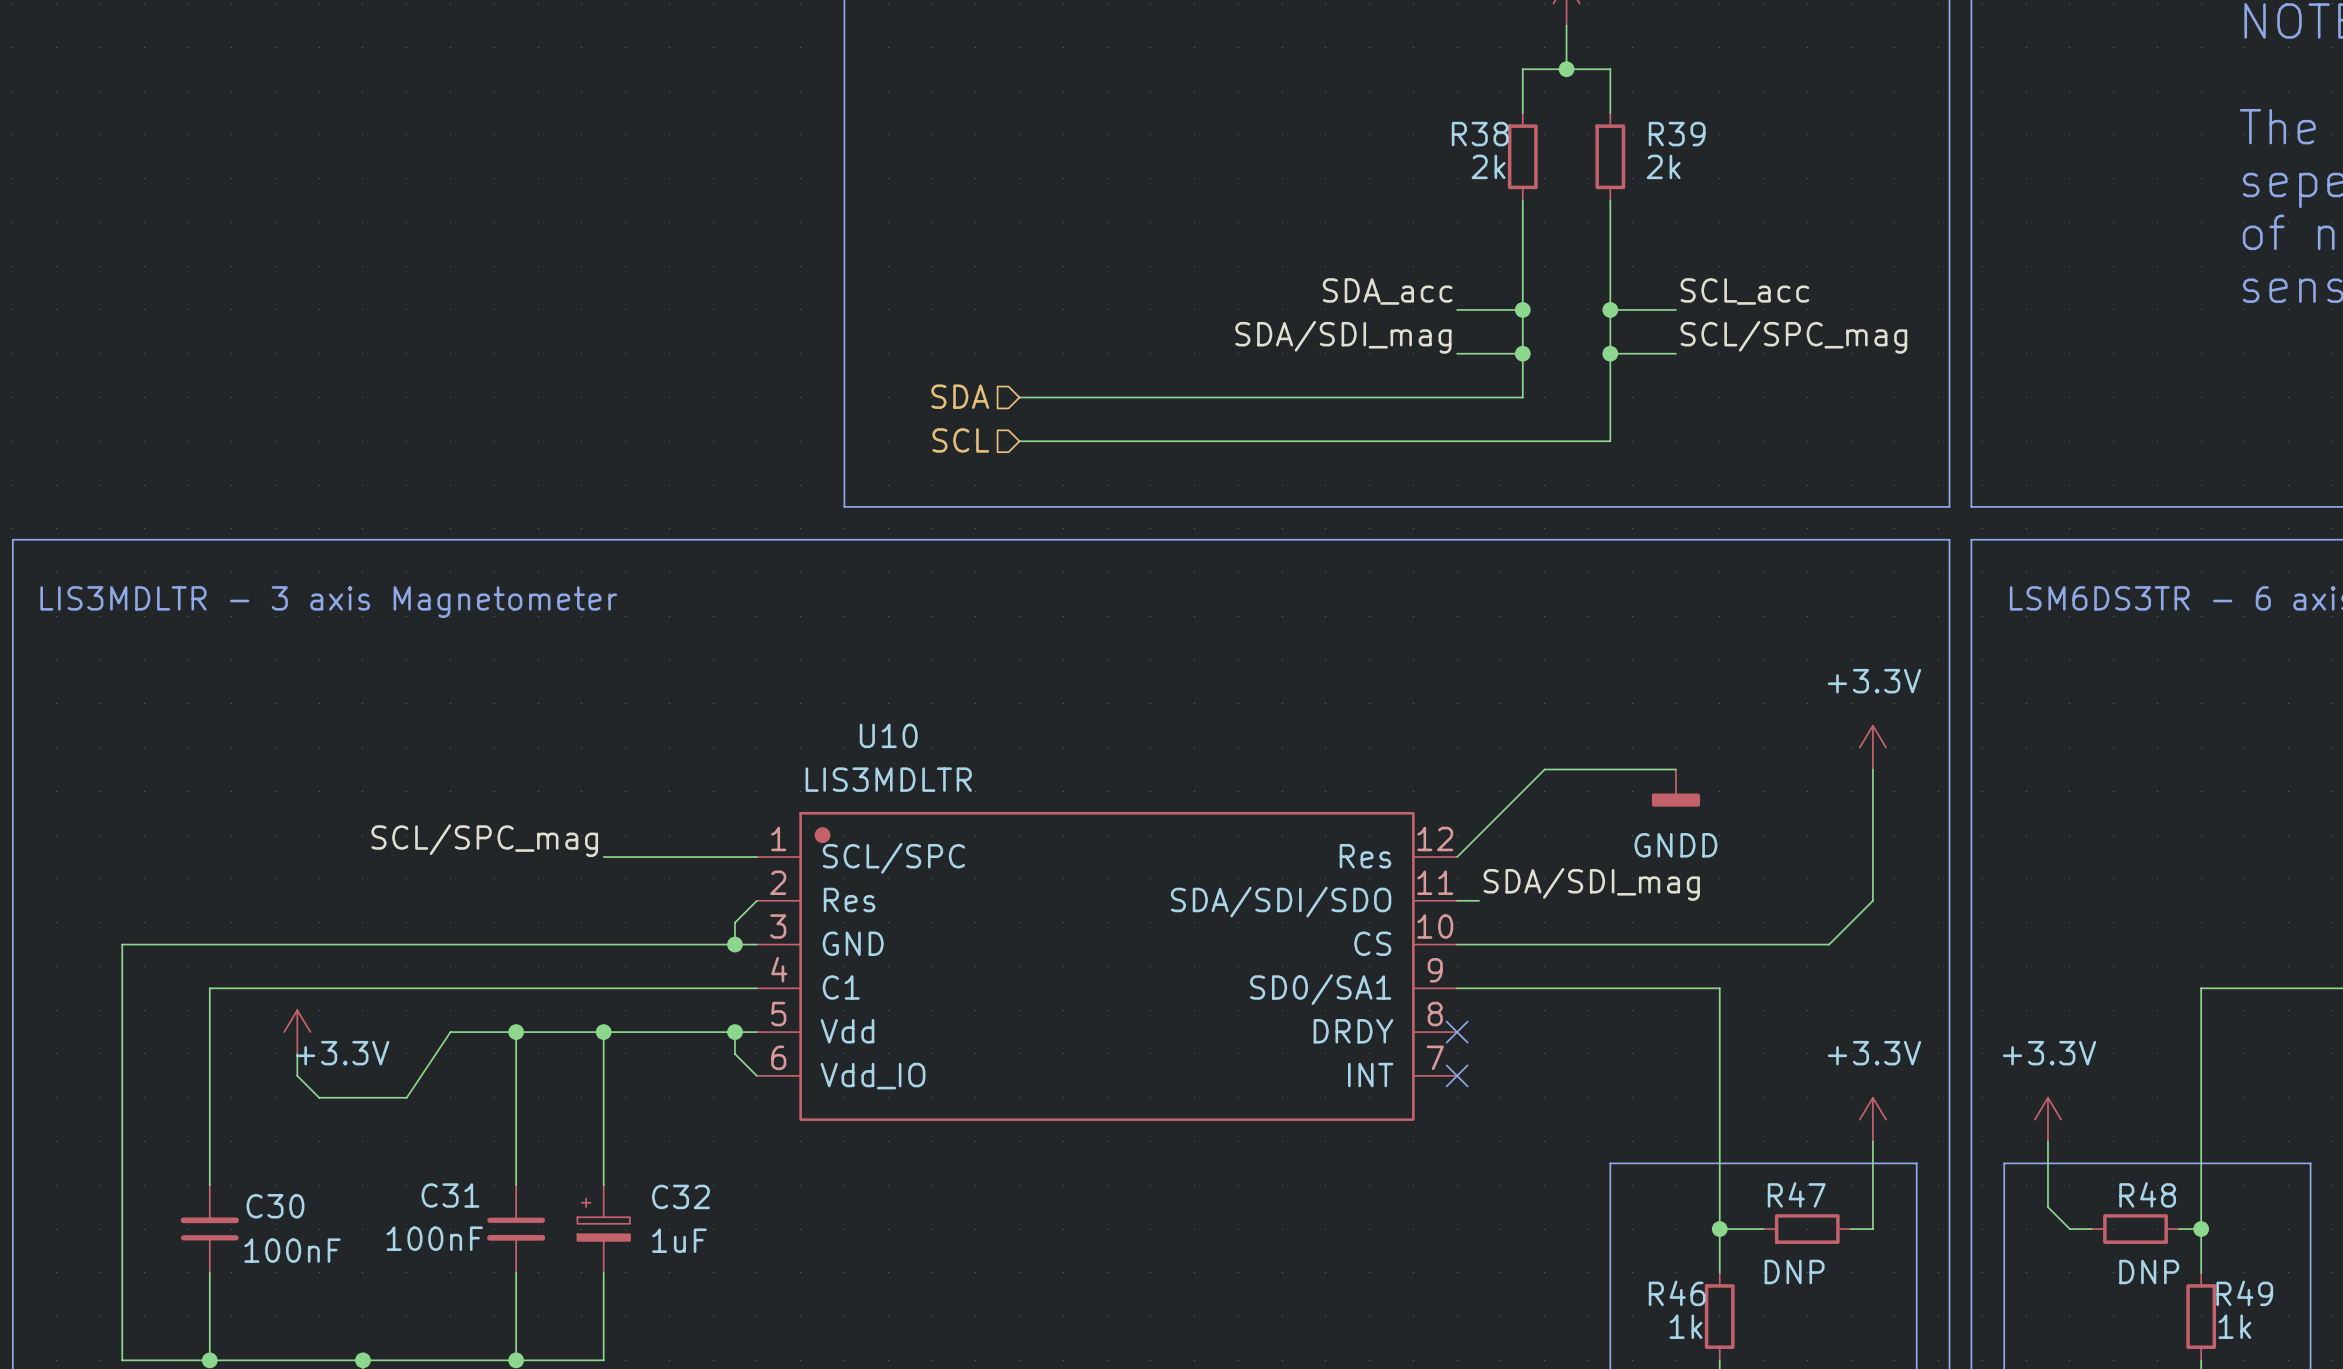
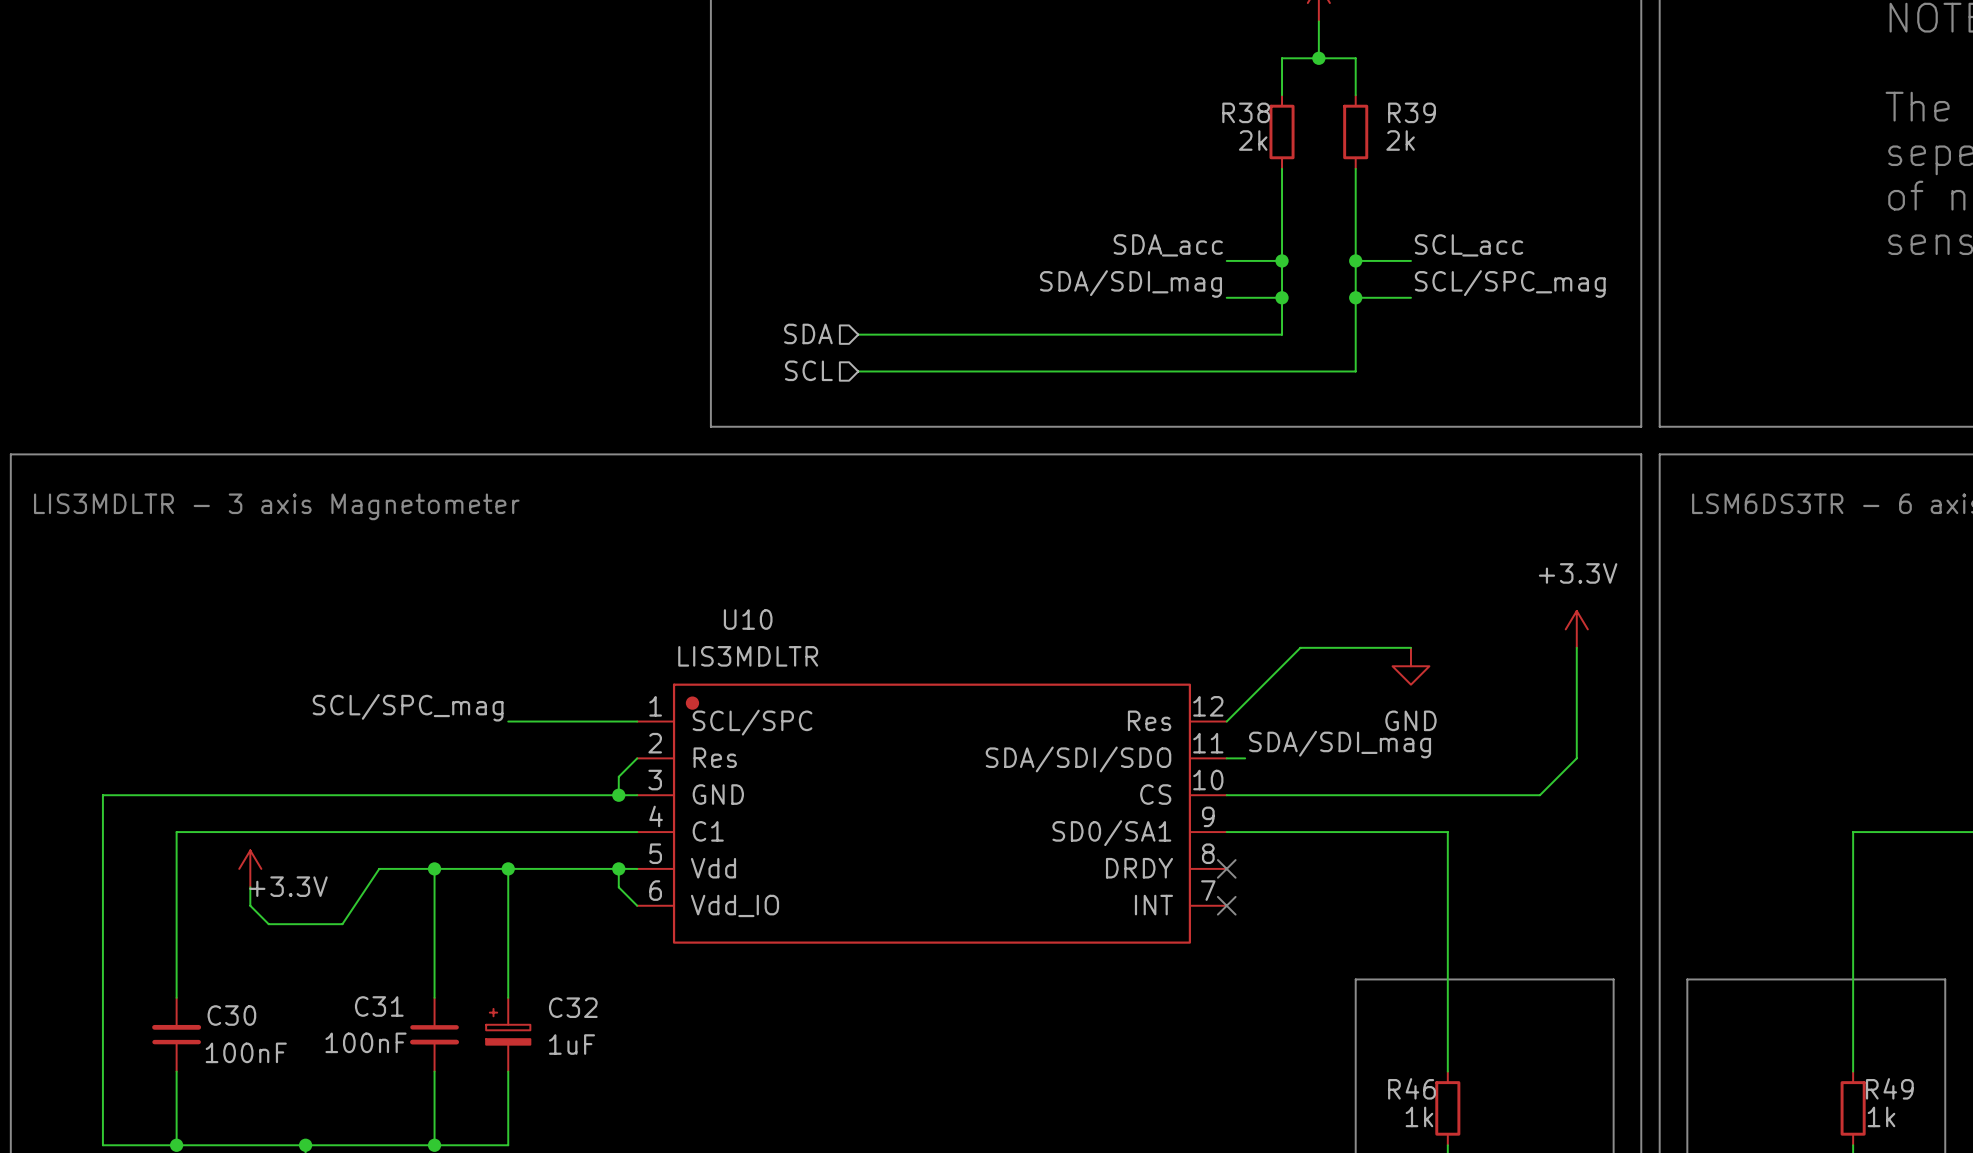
power symbol: GNDD (1675, 788) -> GND (1410, 666)
power symbol: +3.3V (1872, 1119) -> none
power symbol: +3.3V (2047, 1119) -> none
wire: (1872, 1141) (1872, 1229) (1851, 1229) -> none
wire: (2047, 1141) (2047, 1207) (2069, 1229) (2091, 1229) -> none
wire: (1719, 1229) (1763, 1229) -> none
junction: (1719, 1229) -> none
R47: DNP (1807, 1229) -> none
R48: DNP (2135, 1229) -> none
wire: (2179, 1229) (2201, 1229) -> none
junction: (2201, 1229) -> none

